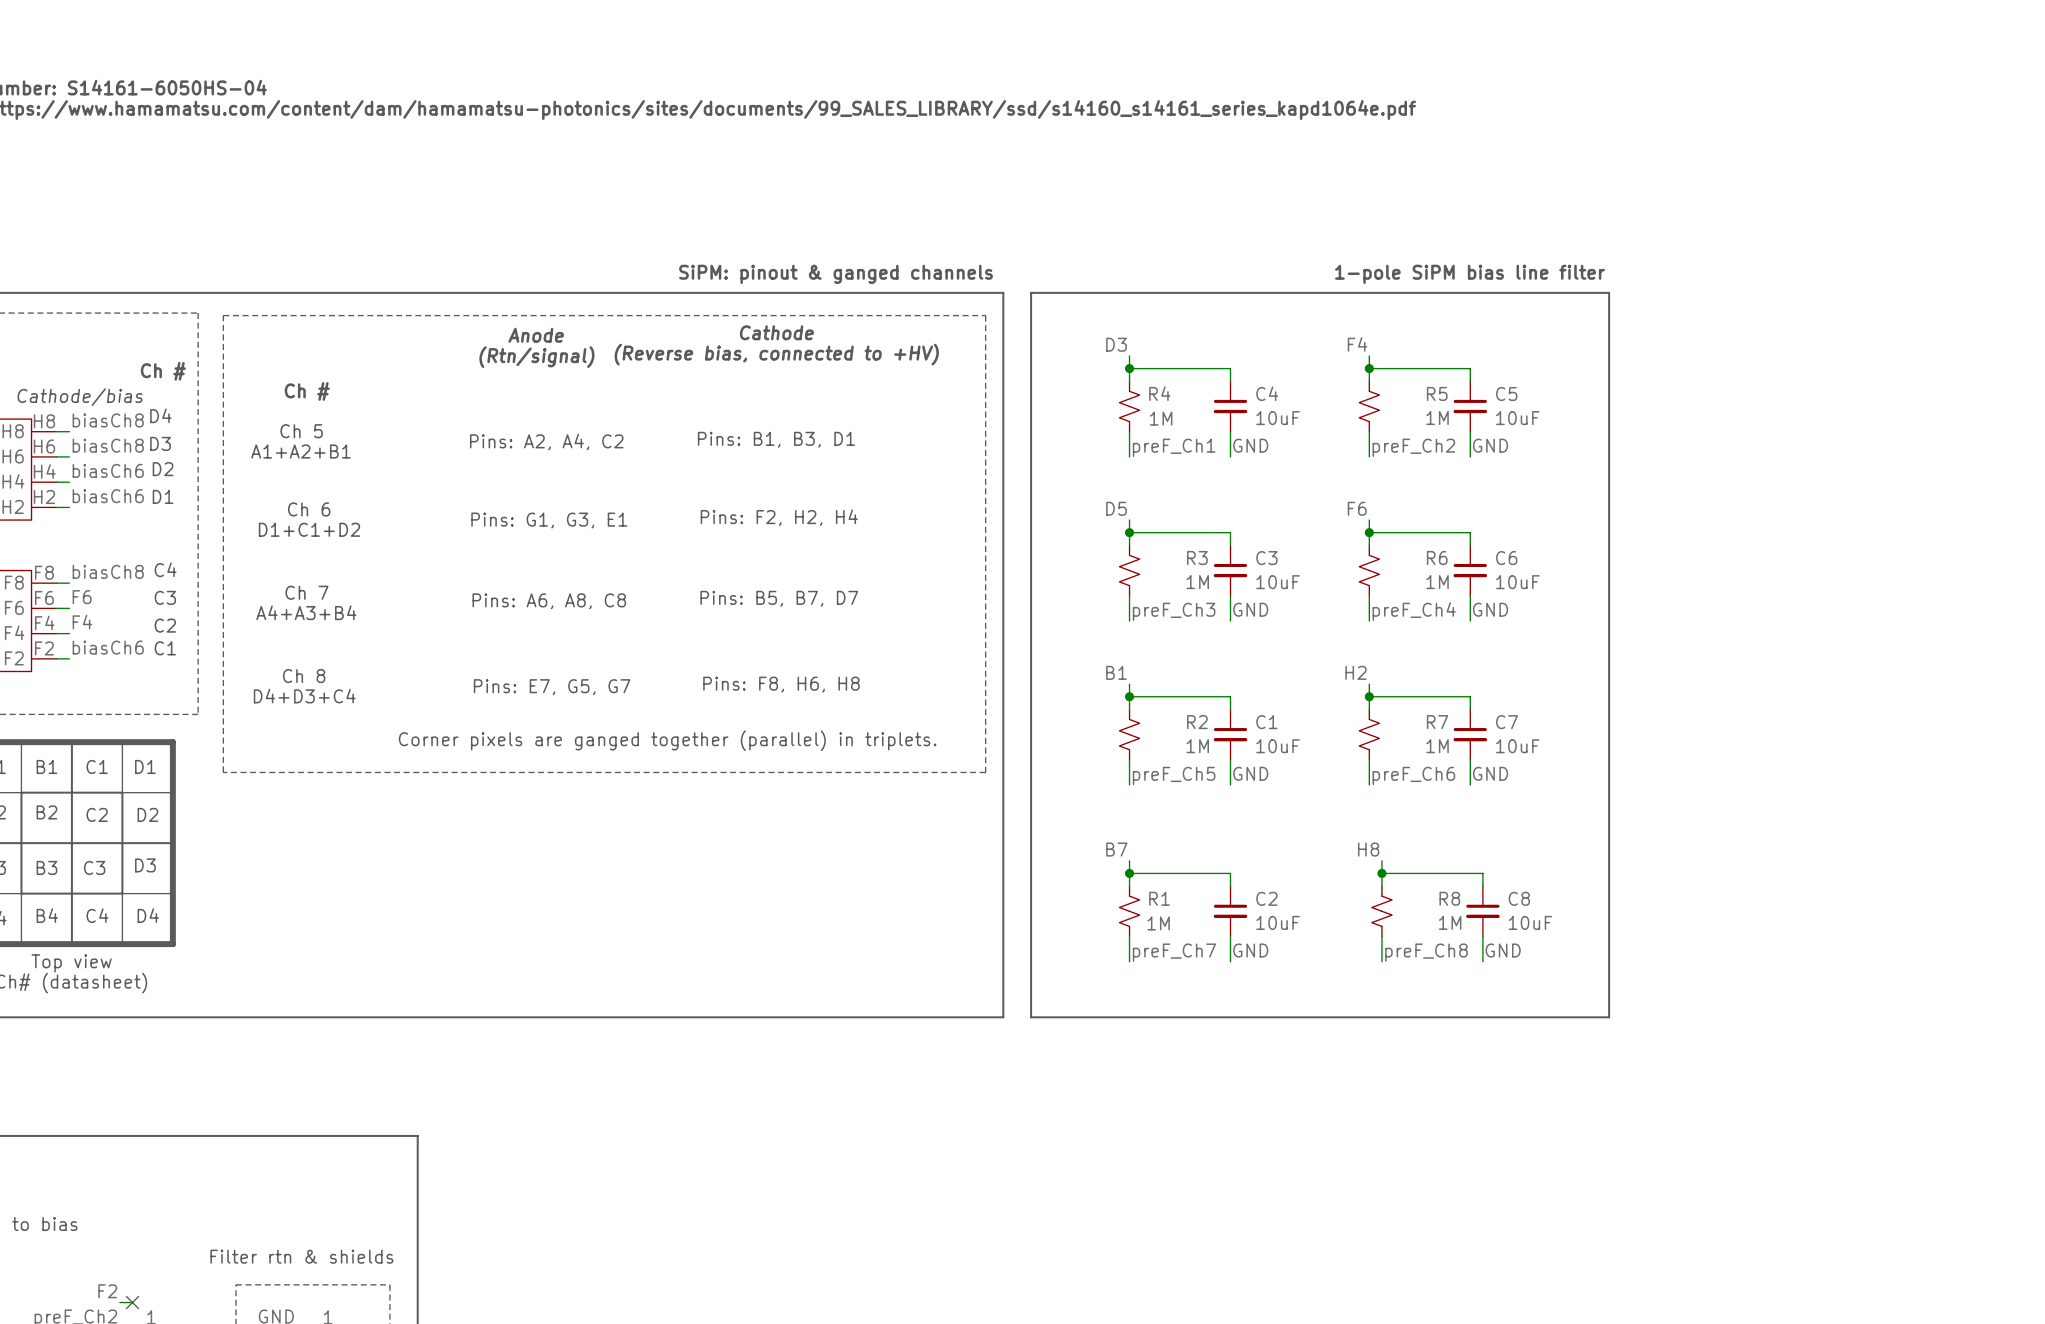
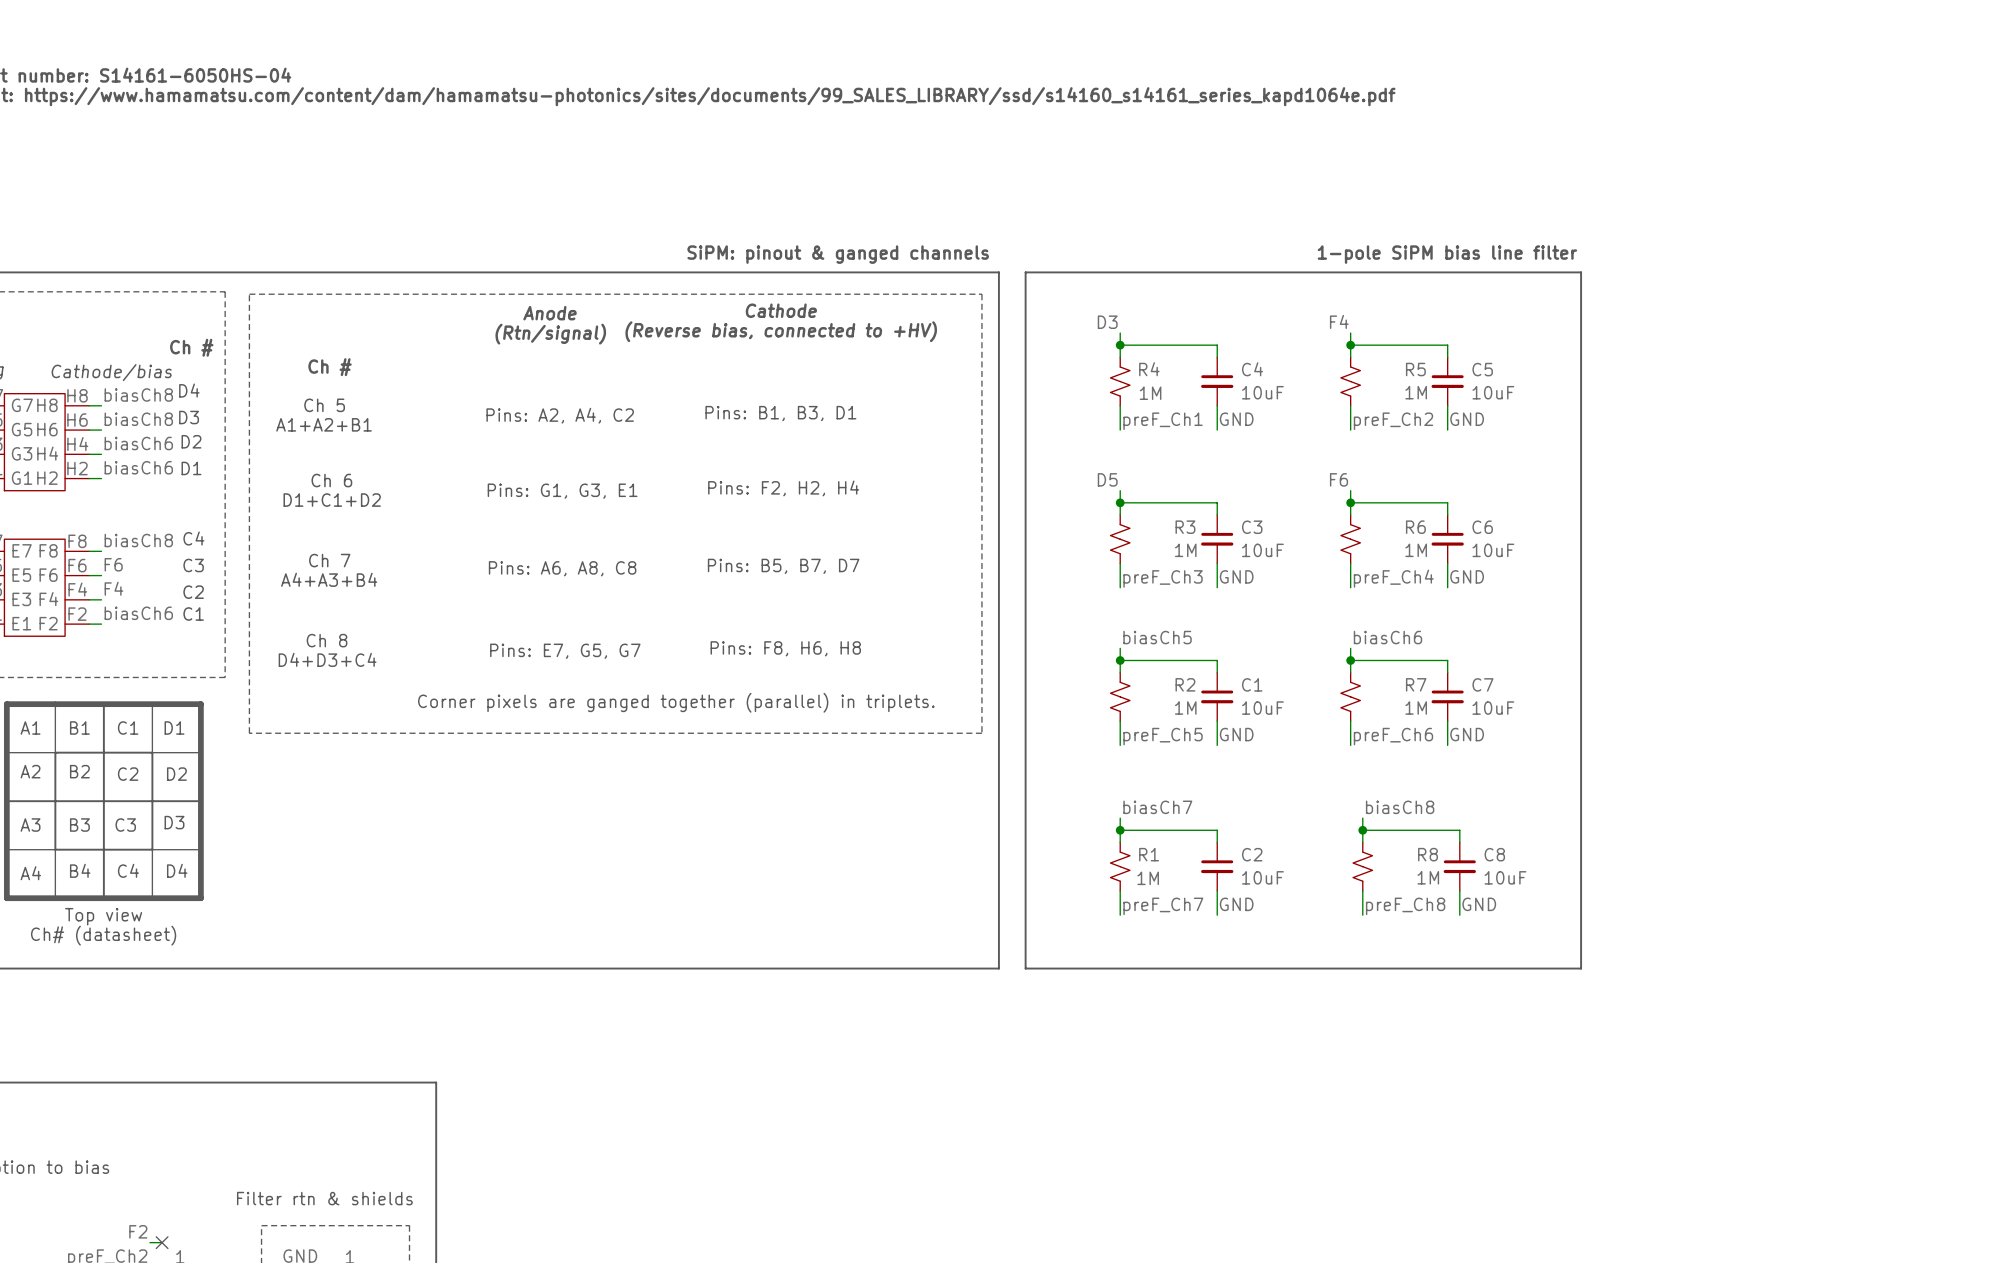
label: B1 (1116, 672) -> biasCh5 (1157, 637)
label: H2 (1356, 672) -> biasCh6 (1387, 637)
label: B7 (1116, 849) -> biasCh7 (1157, 807)
label: H8 (1368, 849) -> biasCh8 (1400, 807)

